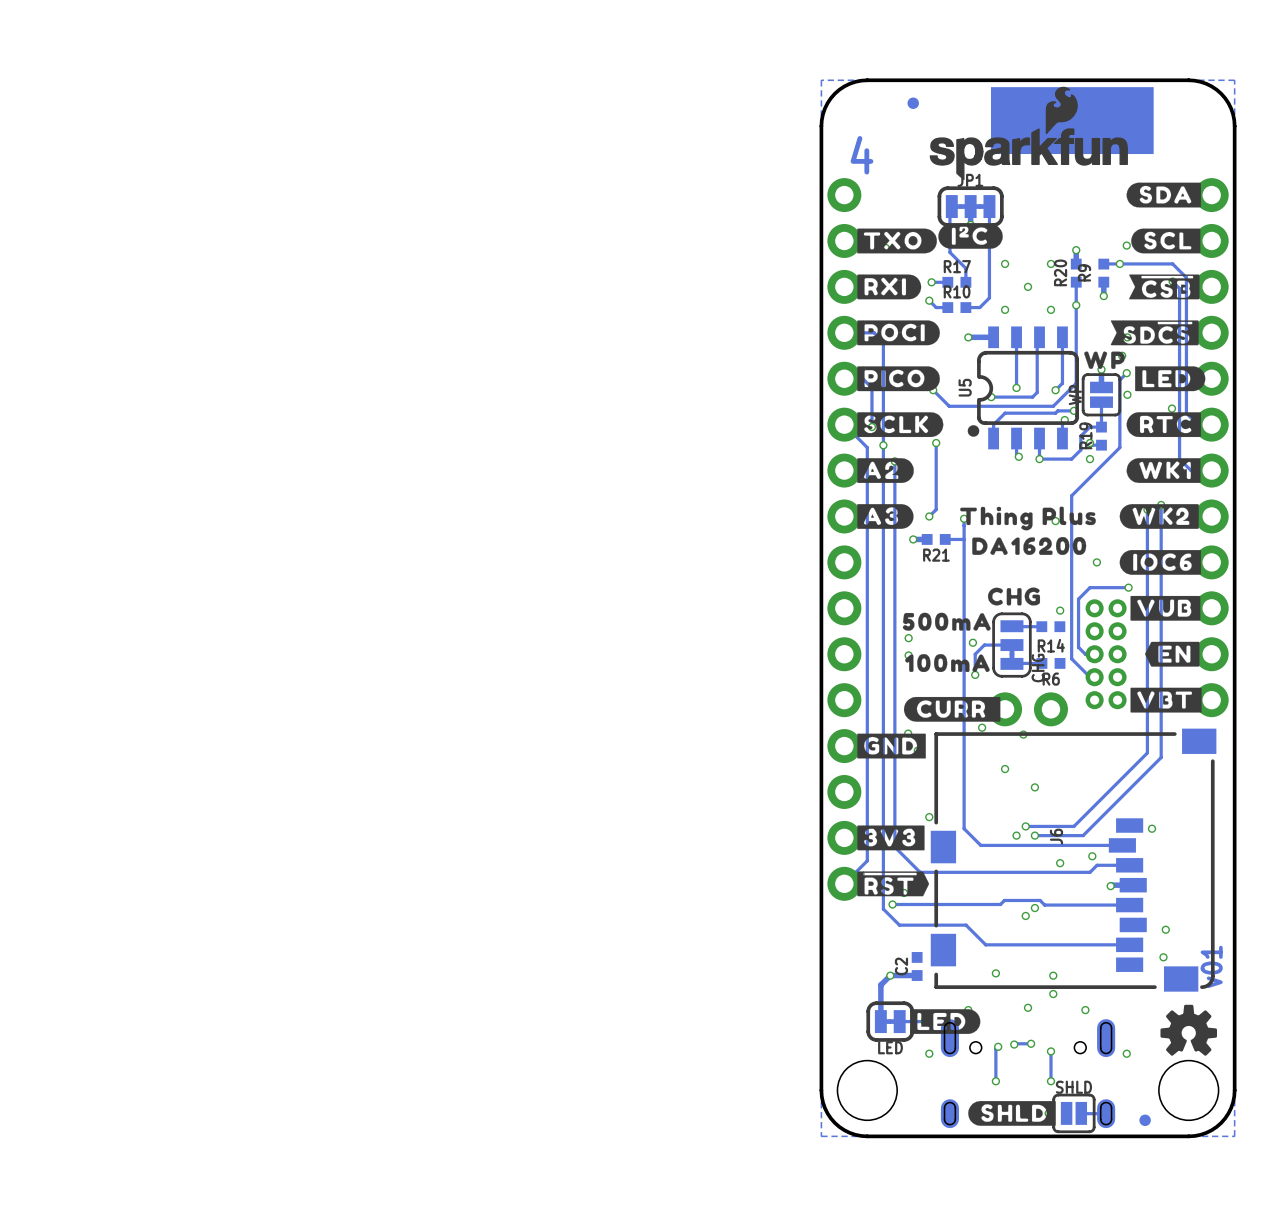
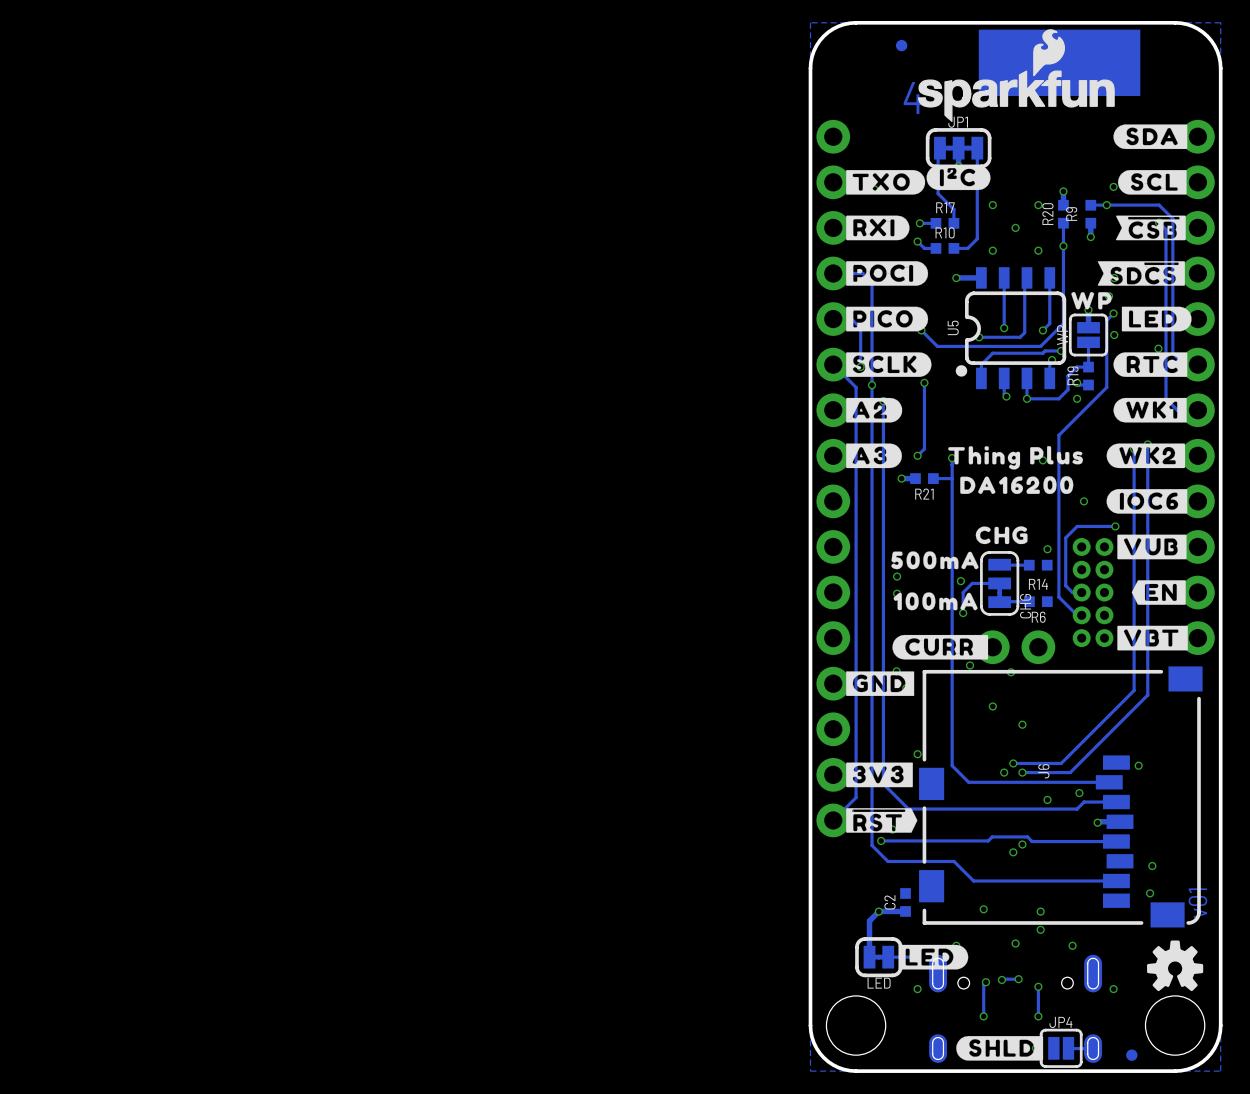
text position: 4 (861, 155) -> 4 (912, 98)
SHLD name: SHLD (1073, 1087) -> JP4 (1060, 1022)

